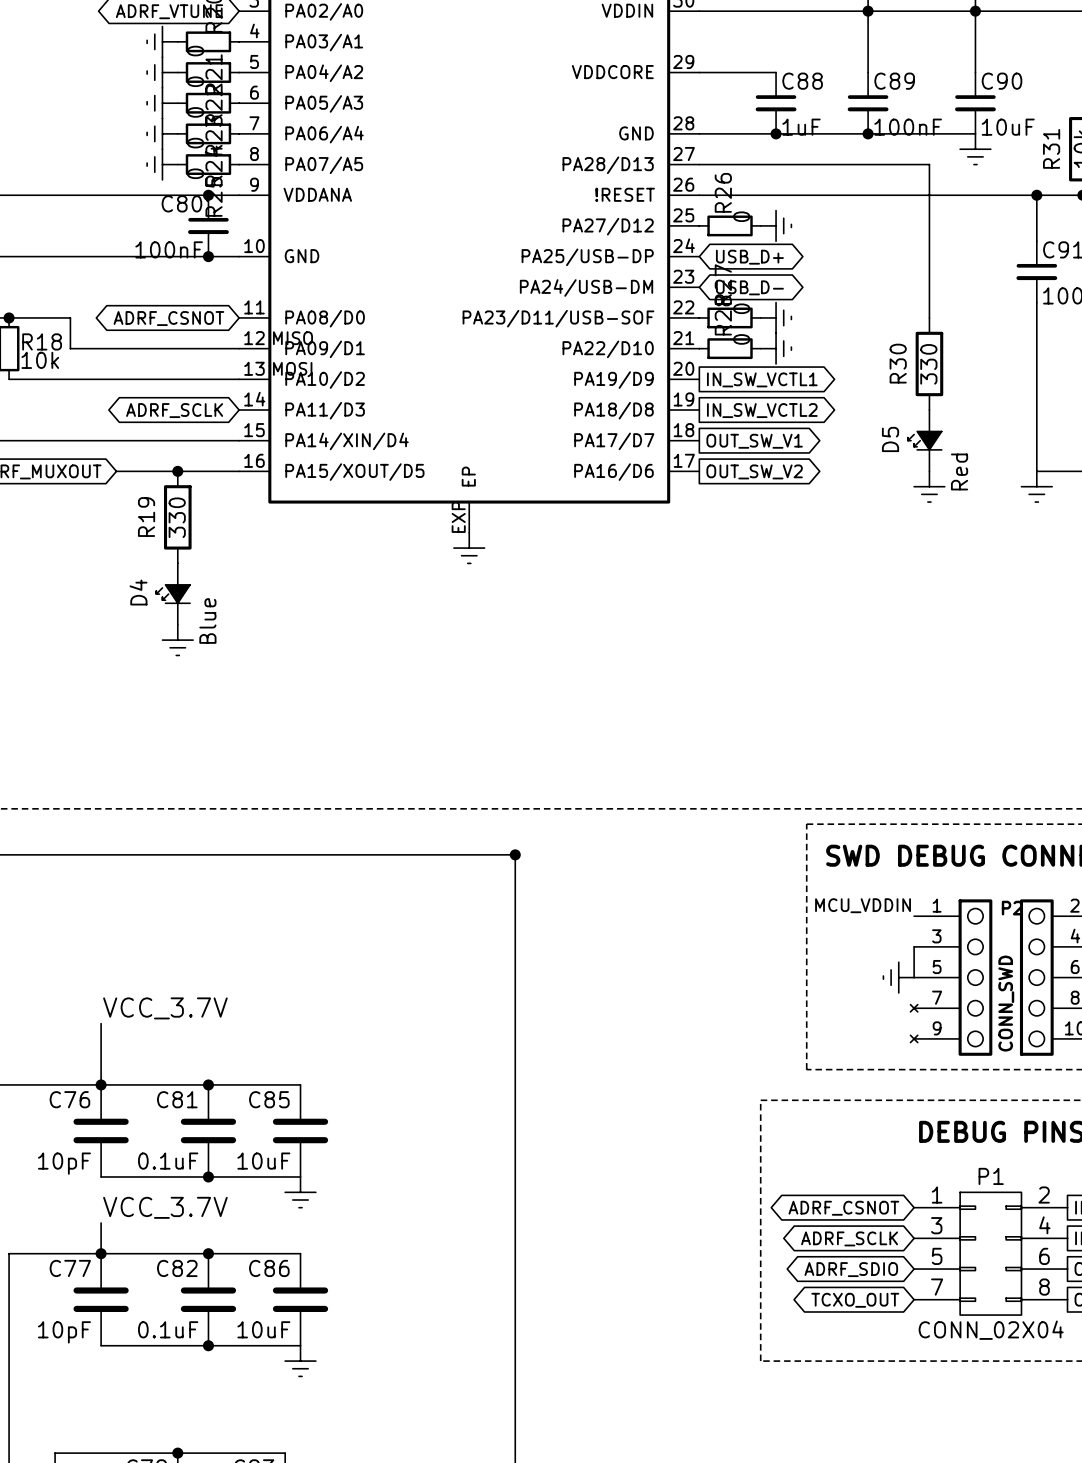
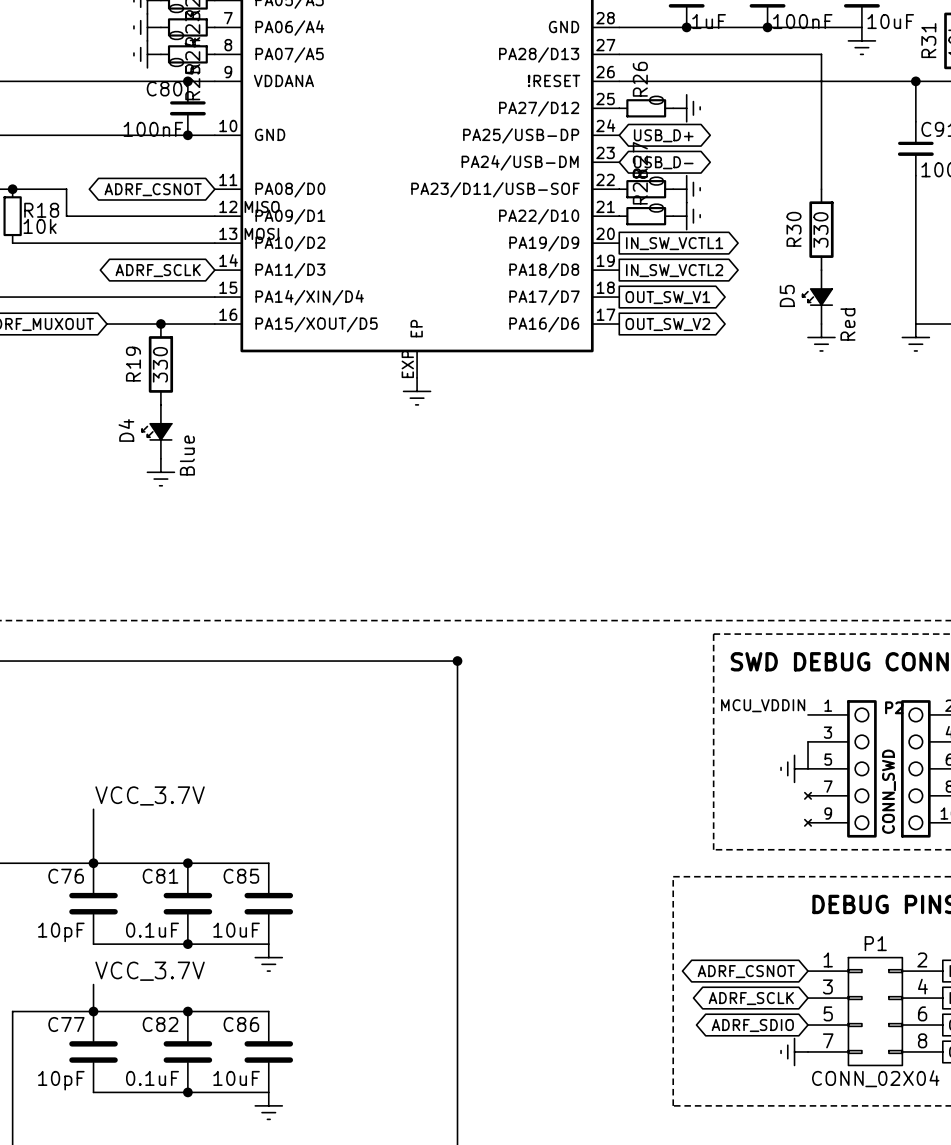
power symbol: none -> (794, 1051)
global label: TCXO_OUT (855, 1300) -> none

